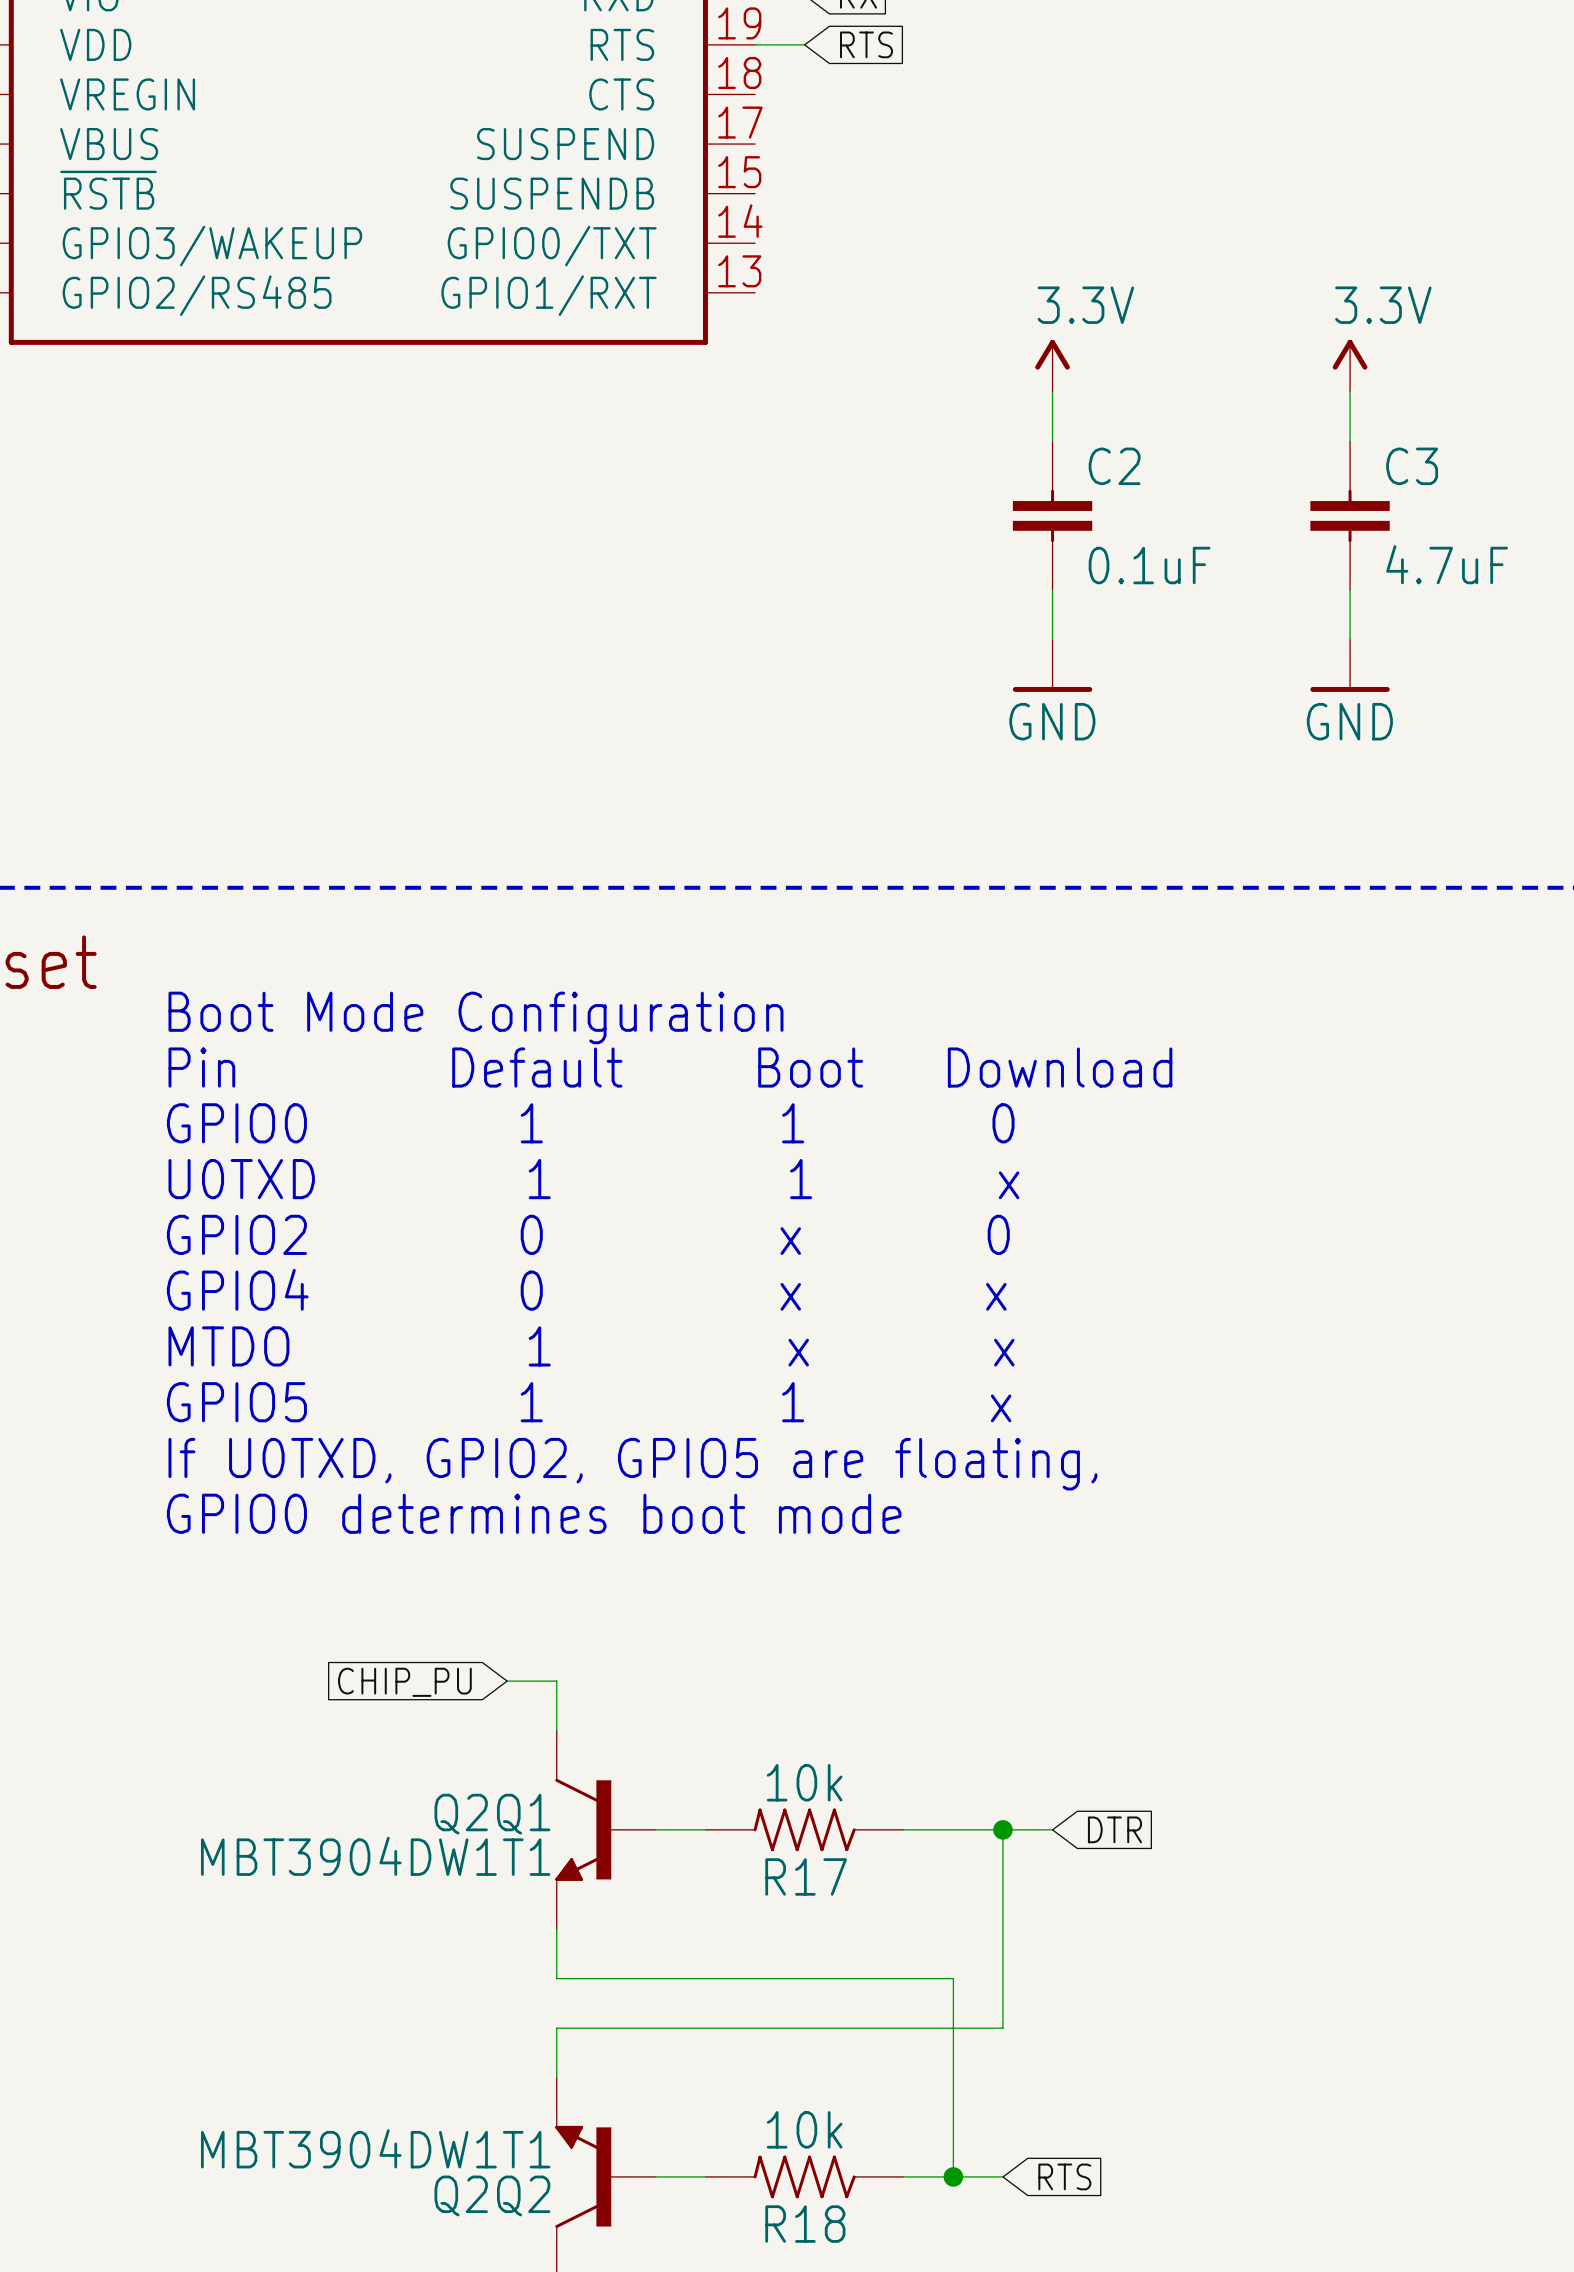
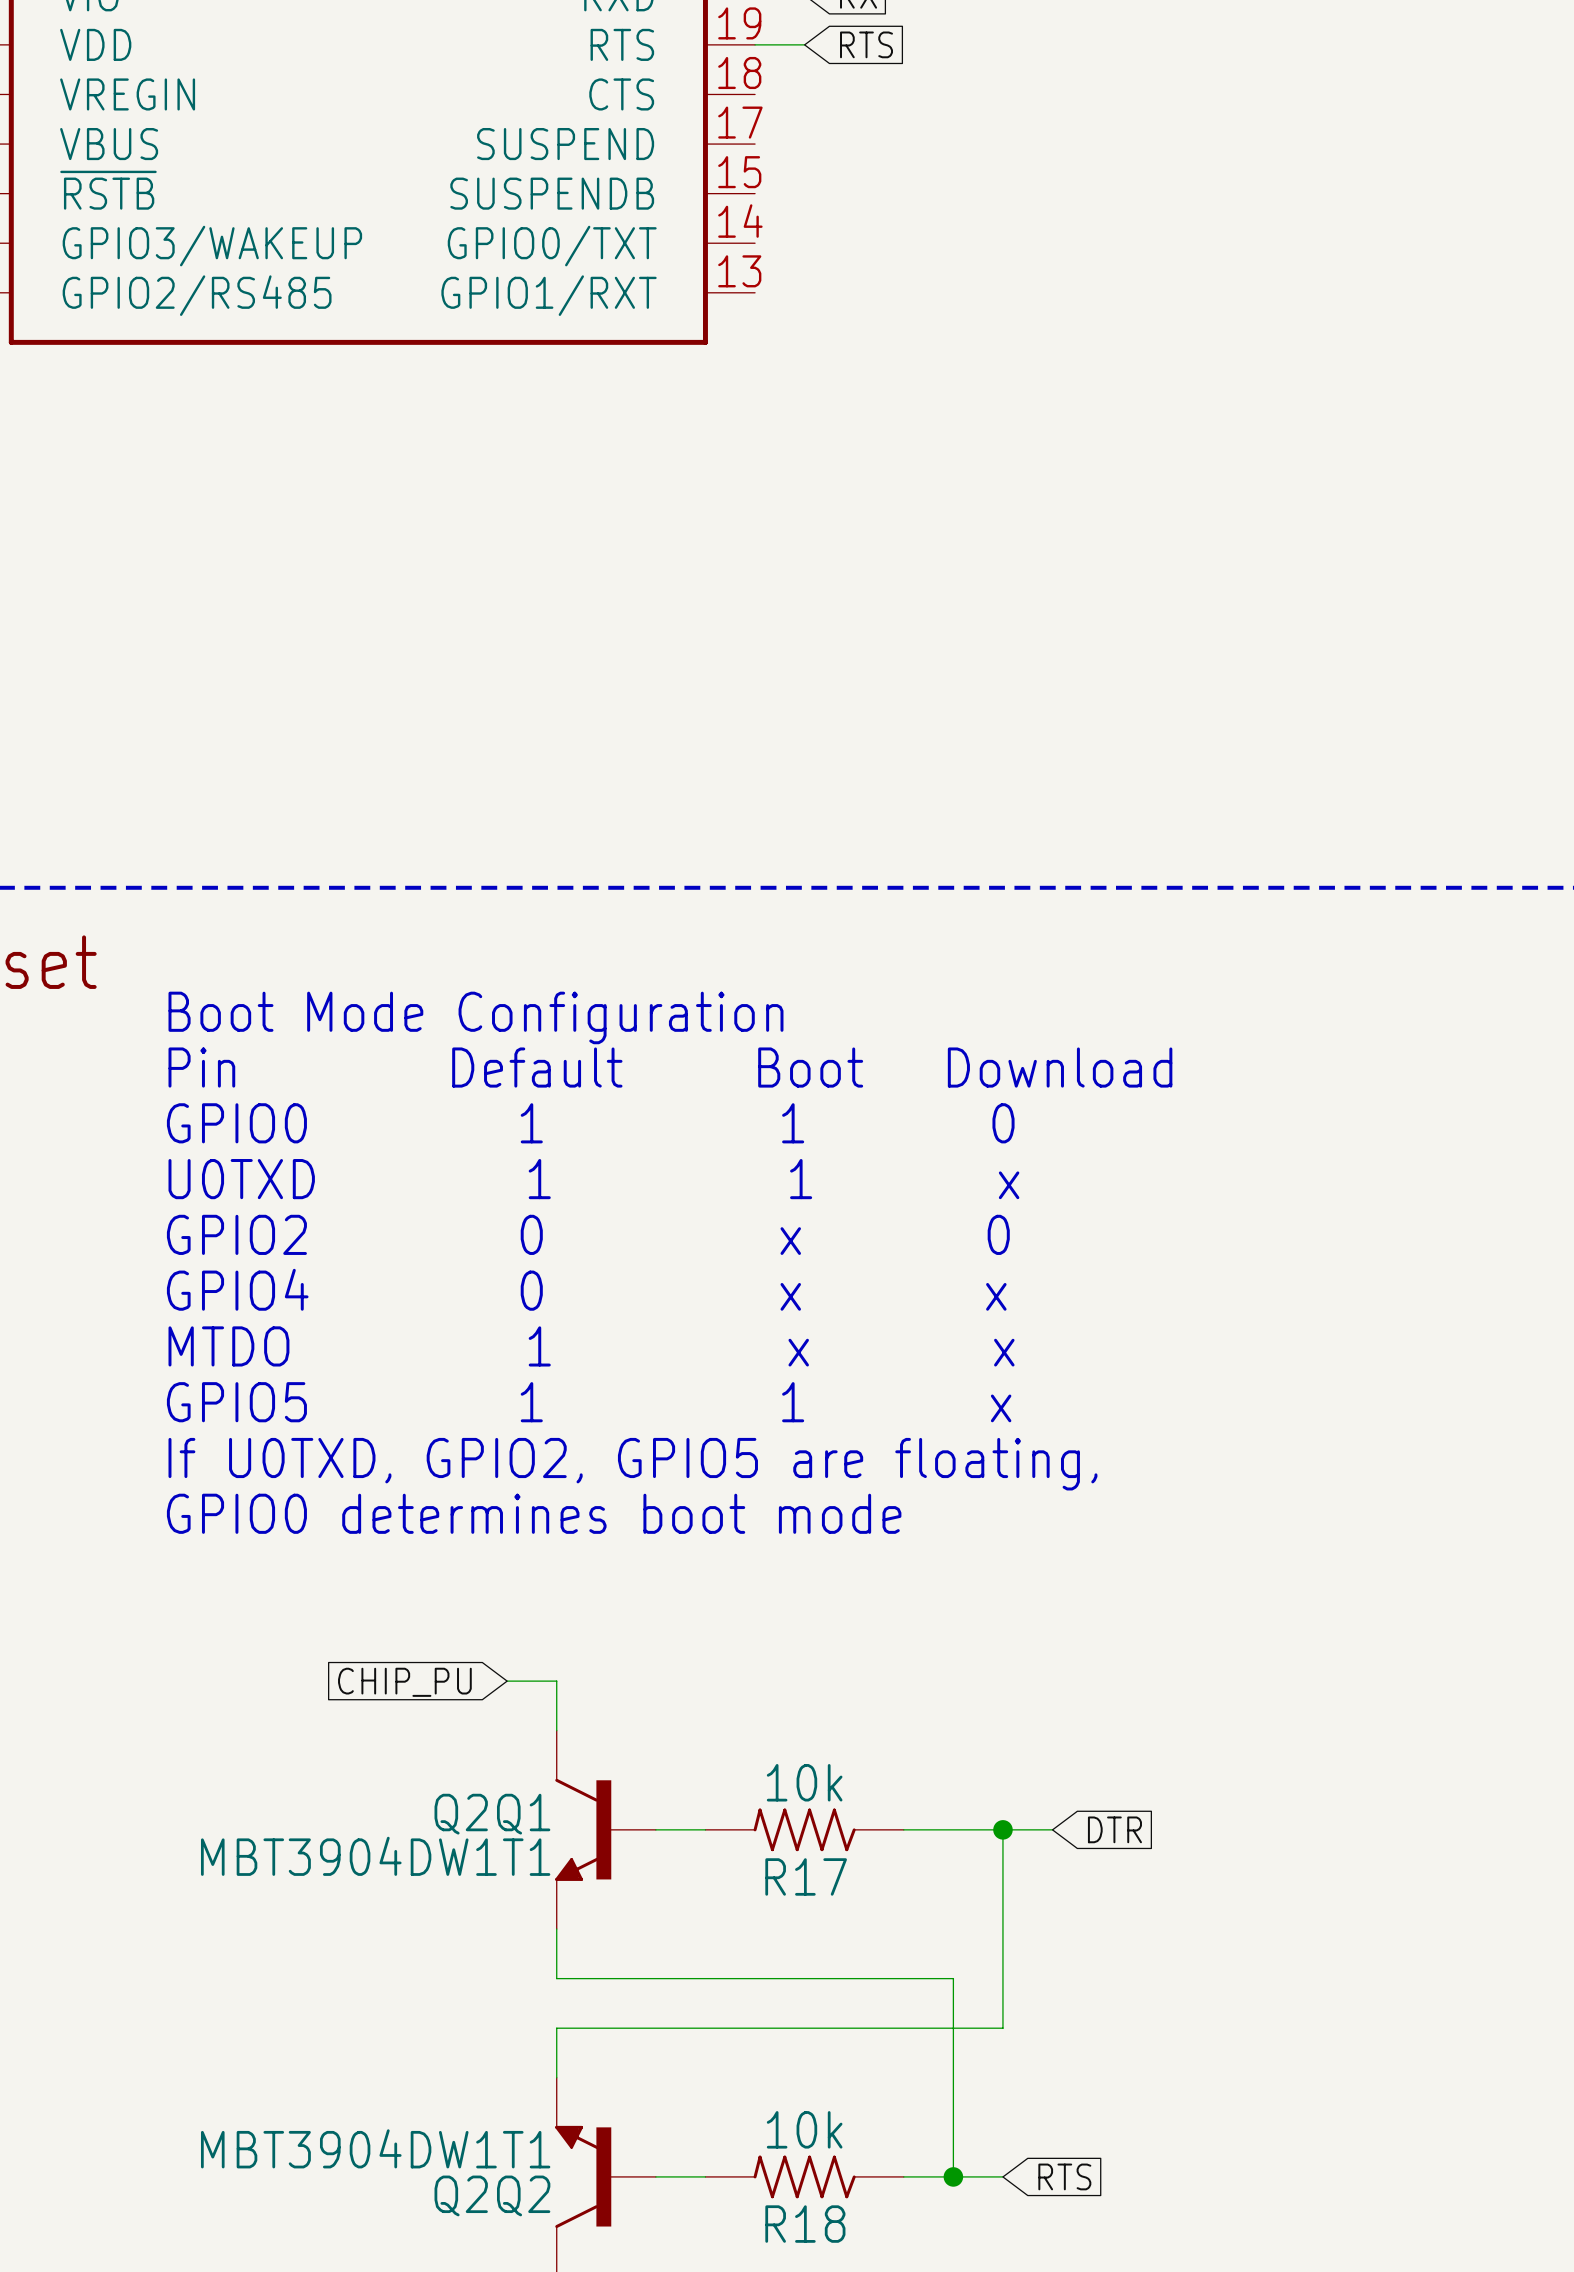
power symbol: 3.3V (1052, 365) -> none
power symbol: 3.3V (1350, 365) -> none
wire: (1052, 391) (1052, 441) -> none
wire: (1350, 391) (1350, 441) -> none
C2: 0.1uF (1052, 515) -> none
C3: 4.7uF (1350, 515) -> none
wire: (1052, 590) (1052, 639) -> none
wire: (1350, 590) (1350, 639) -> none
power symbol: GND (1052, 665) -> none
power symbol: GND (1350, 665) -> none

